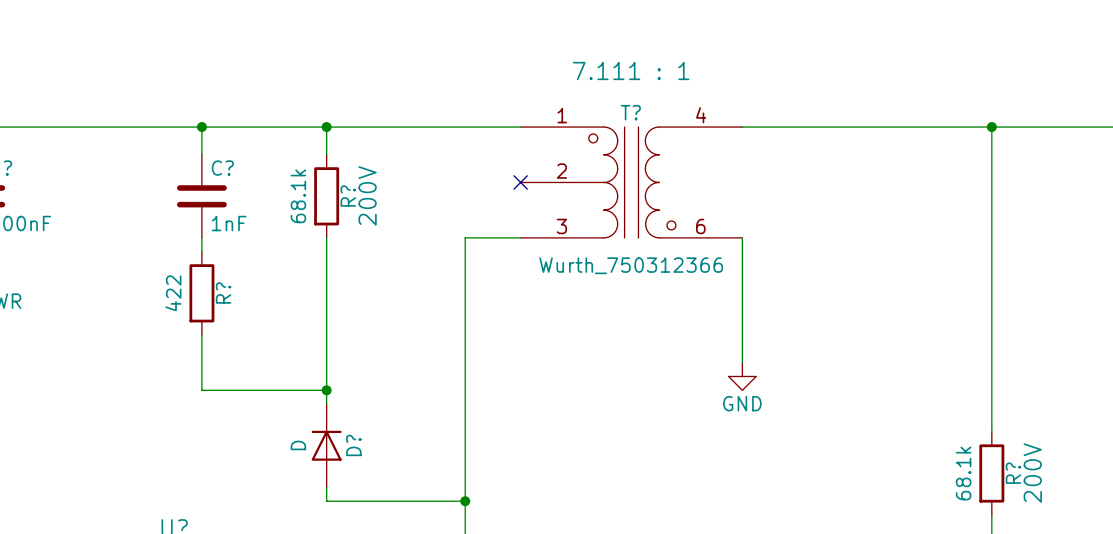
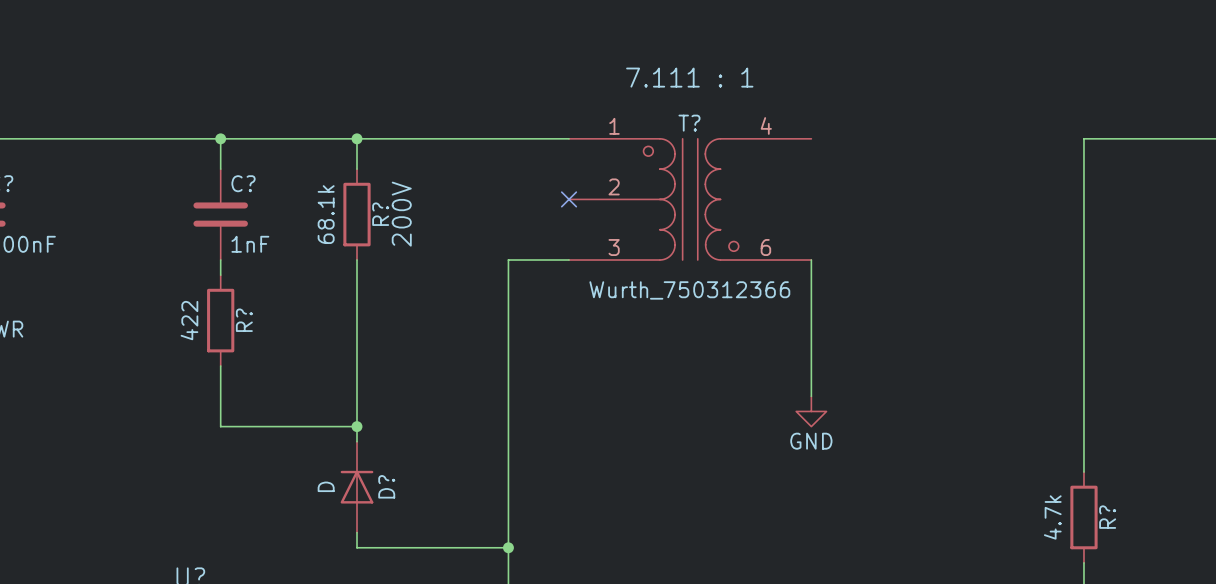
wire: (742, 127) (991, 127) -> none
junction: (991, 127) -> none
R? value: 68.1k (963, 473) -> 4.7k (1052, 517)
R? text: 200V (1032, 473) -> none

